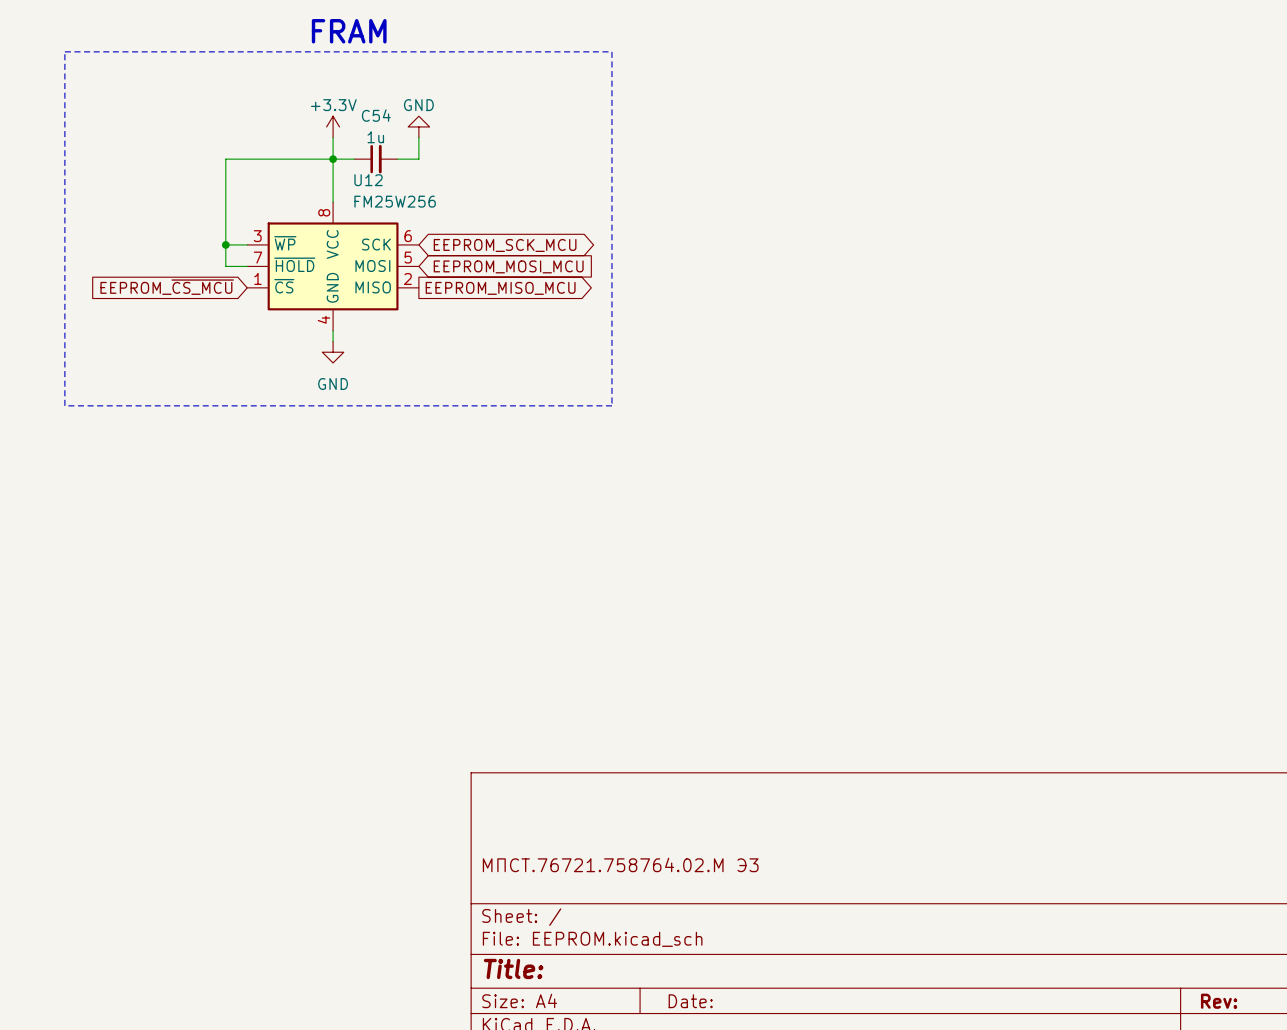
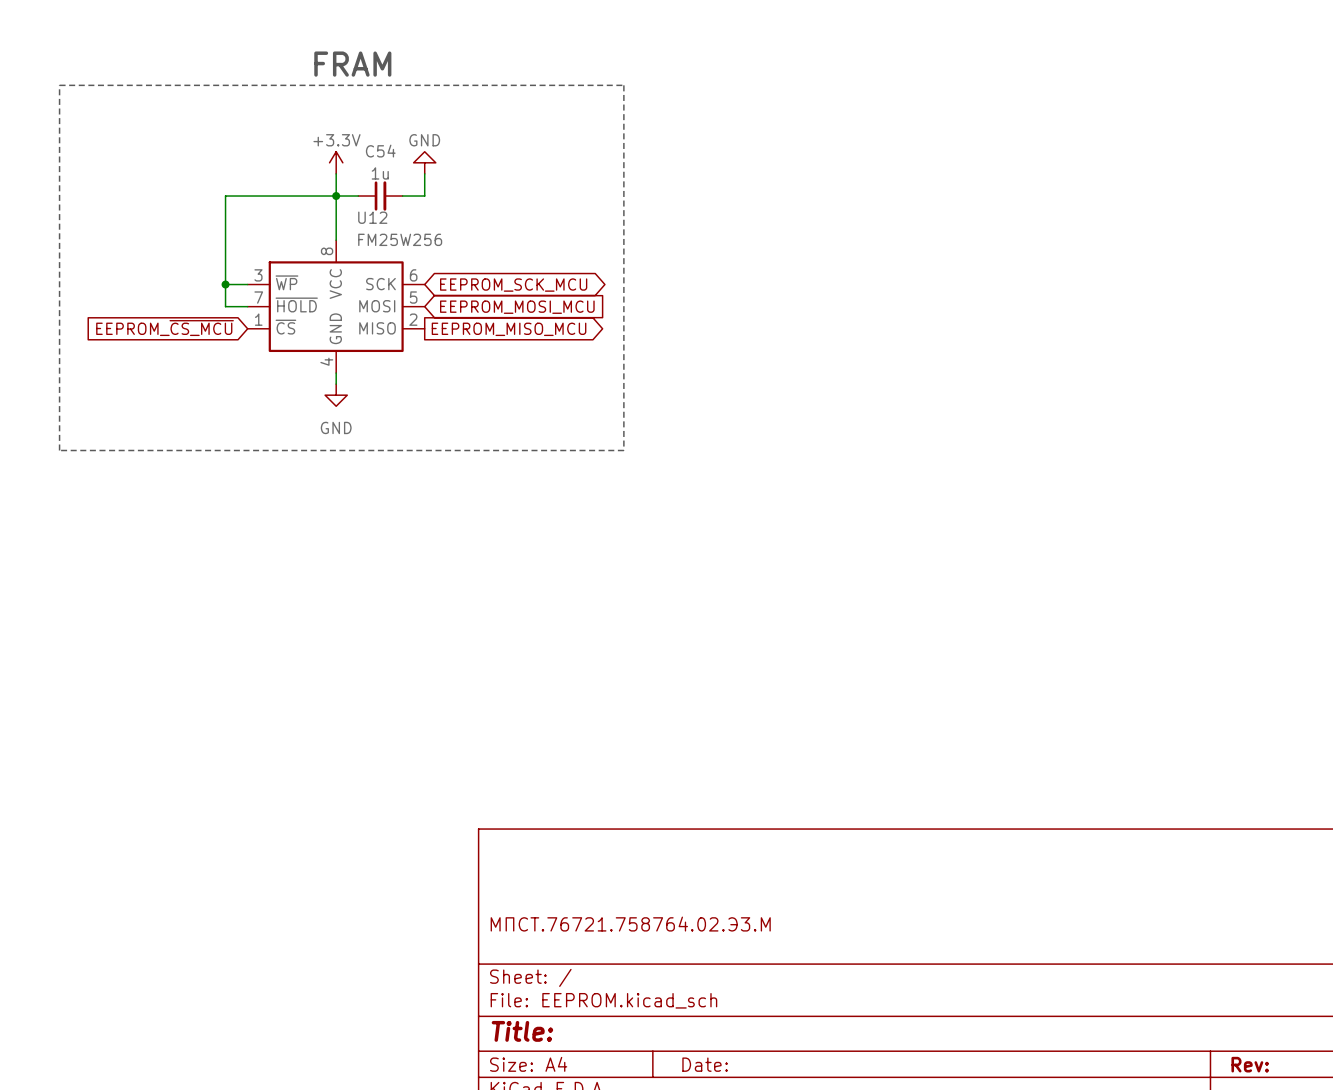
title block: МПСТ.76721.758764.02.М Э3 (620, 864) -> МПСТ.76721.758764.02.Э3.М (630, 924)

